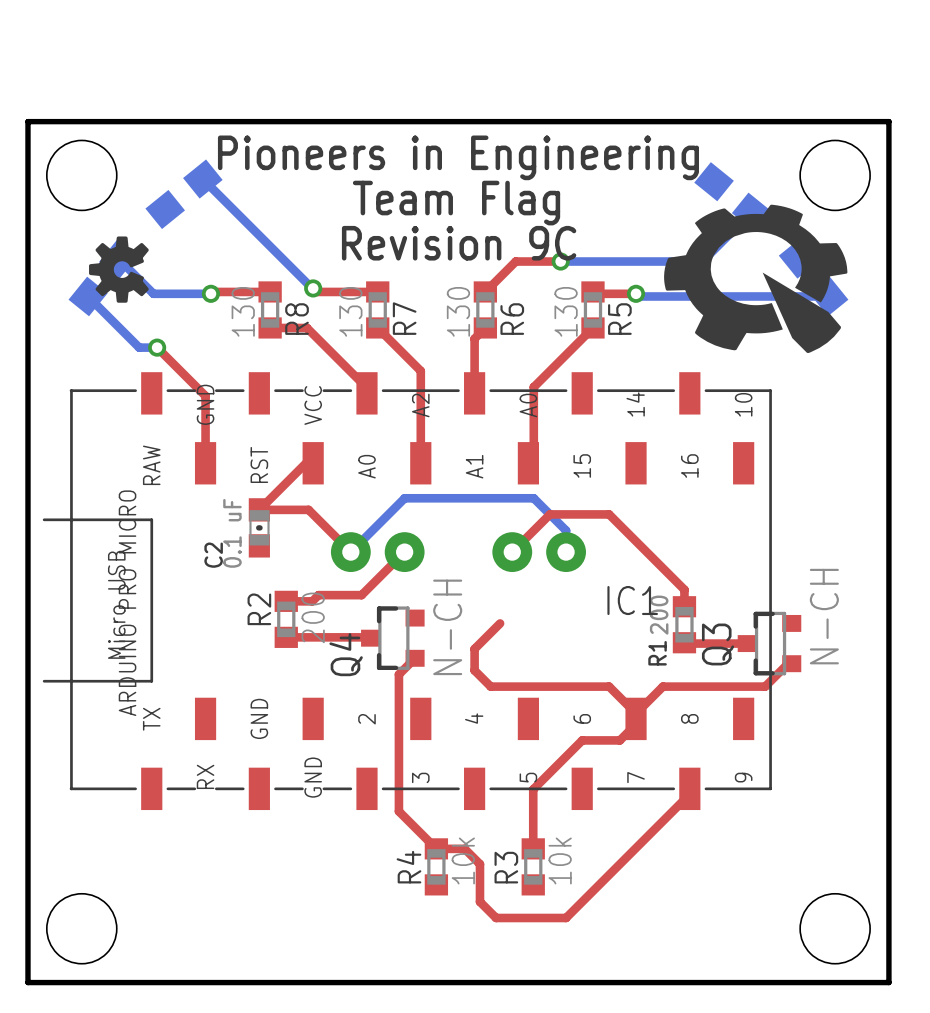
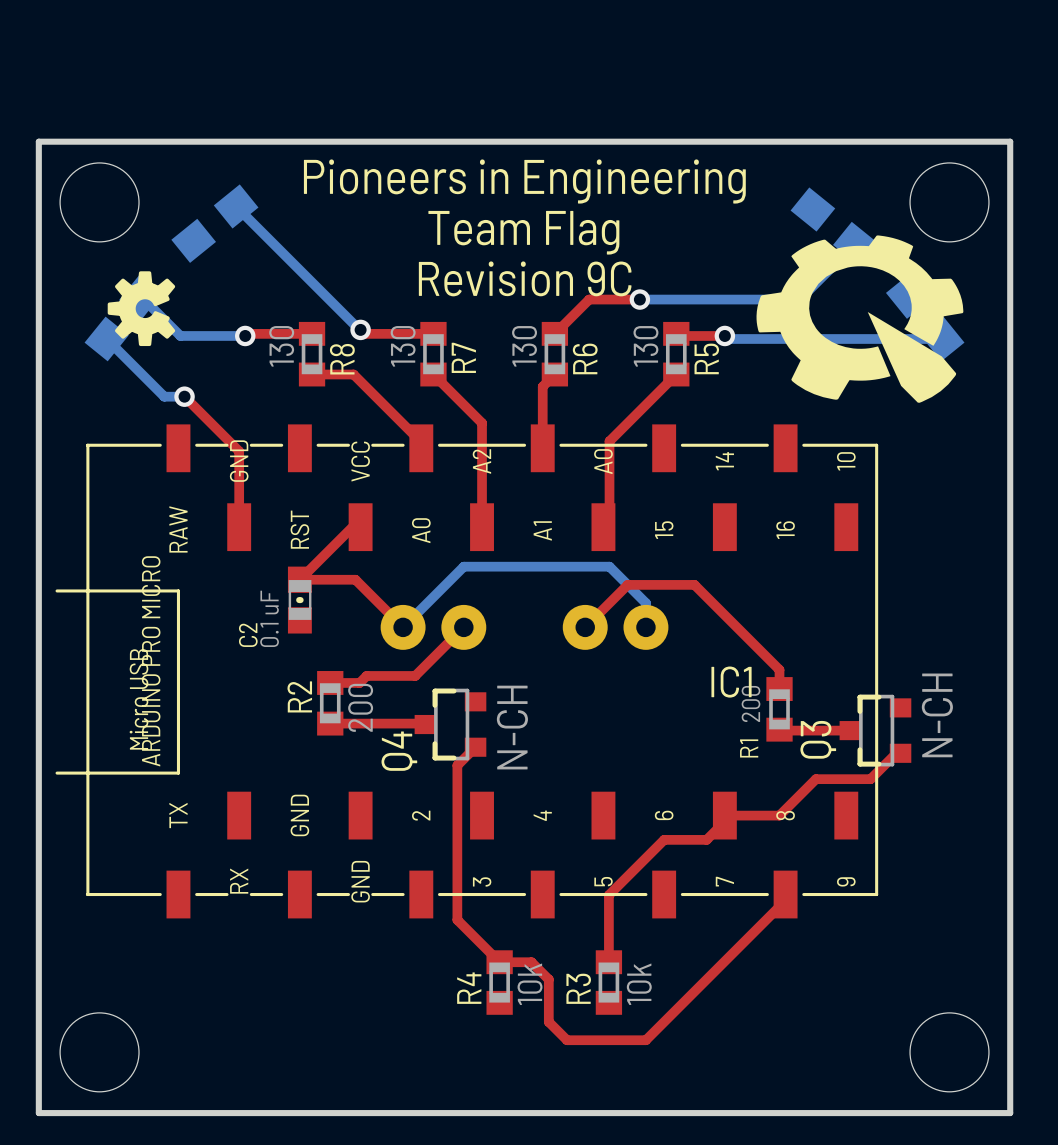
top track: (500, 623) (474, 648) (474, 670) (490, 686) (609, 686) (636, 713) (662, 686) (716, 686) -> (724, 815) (779, 815) (815, 779)

